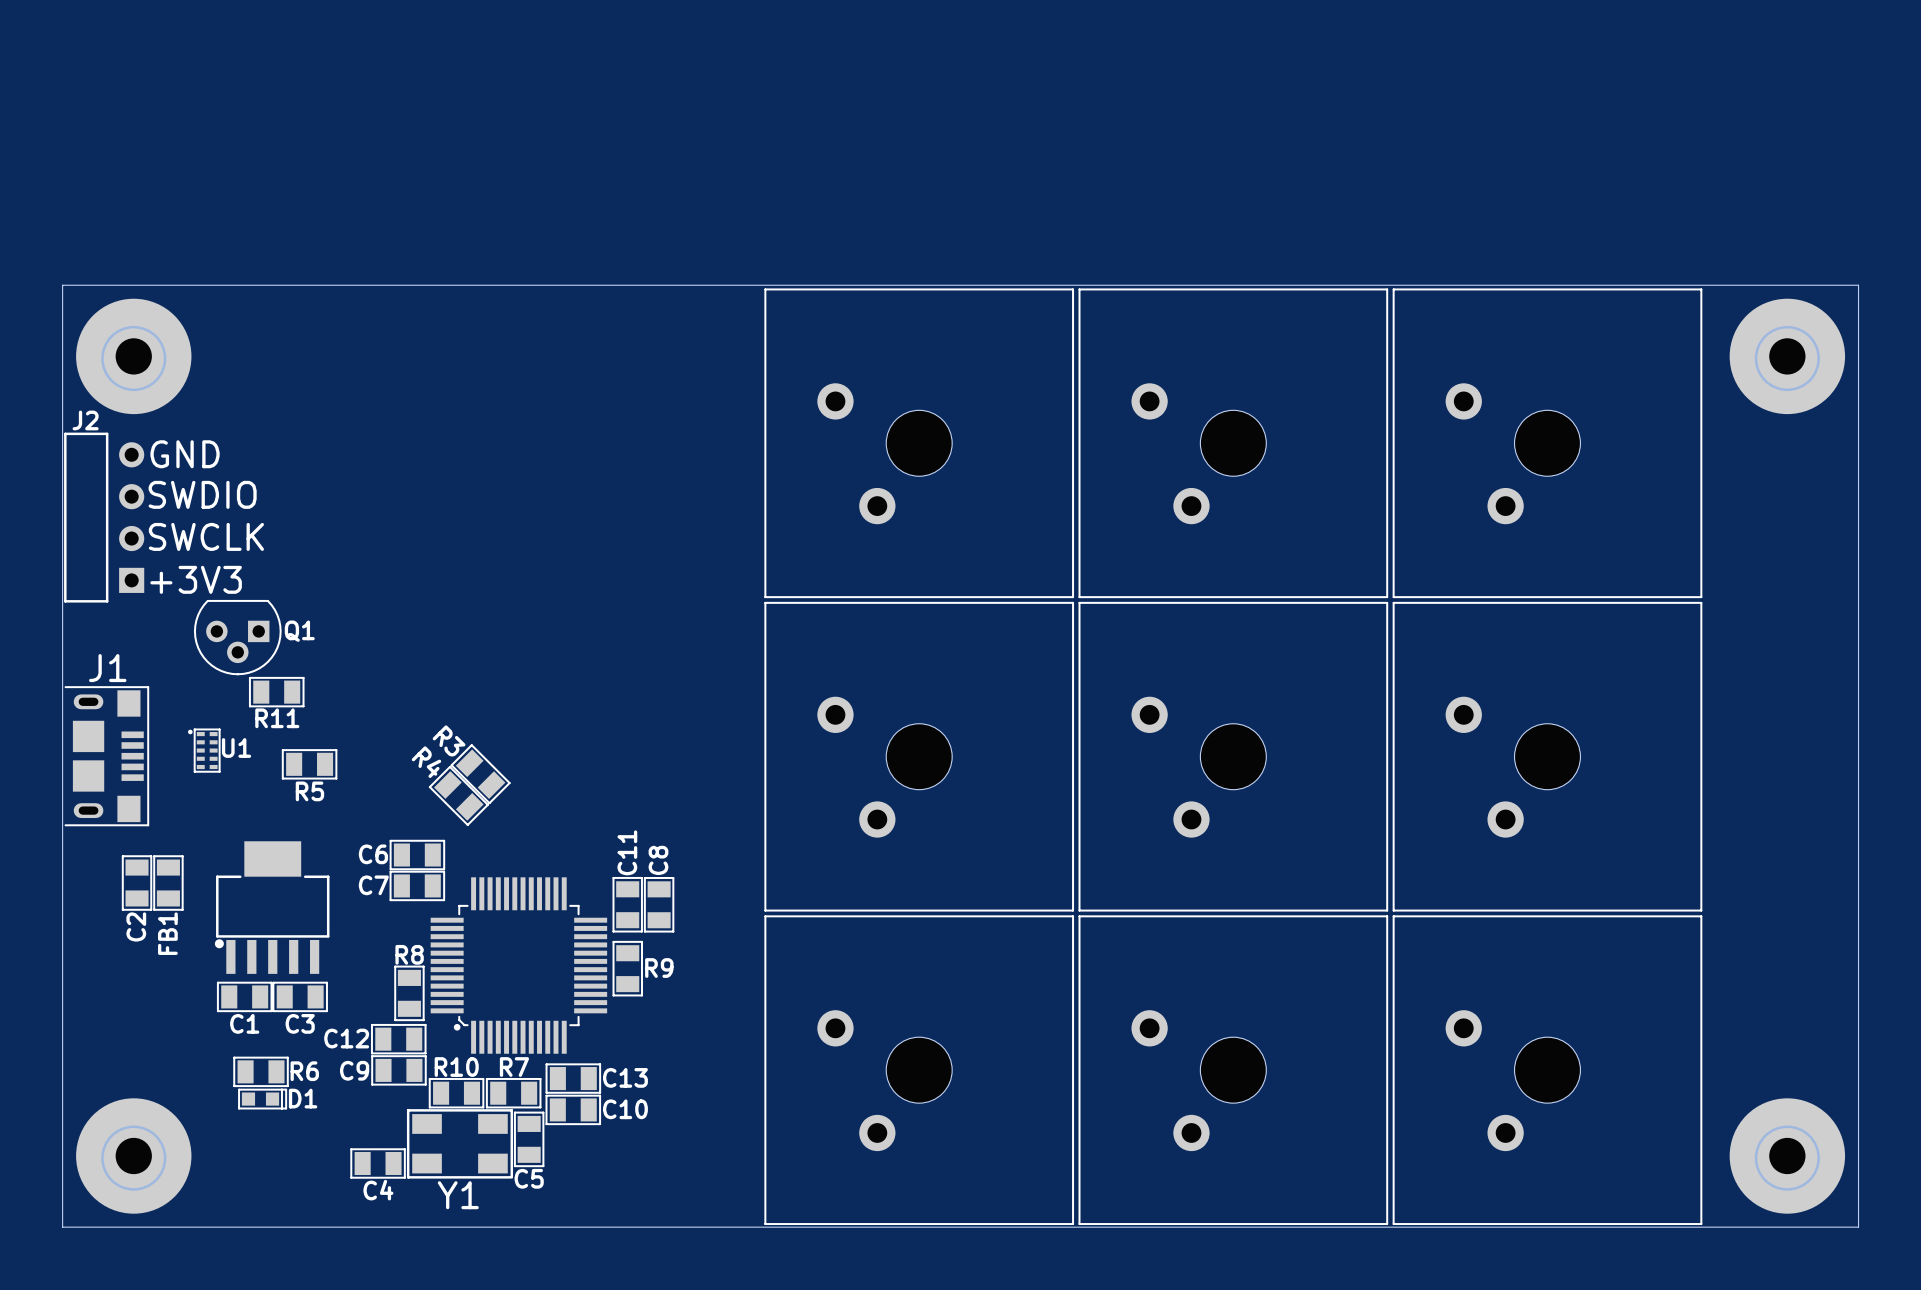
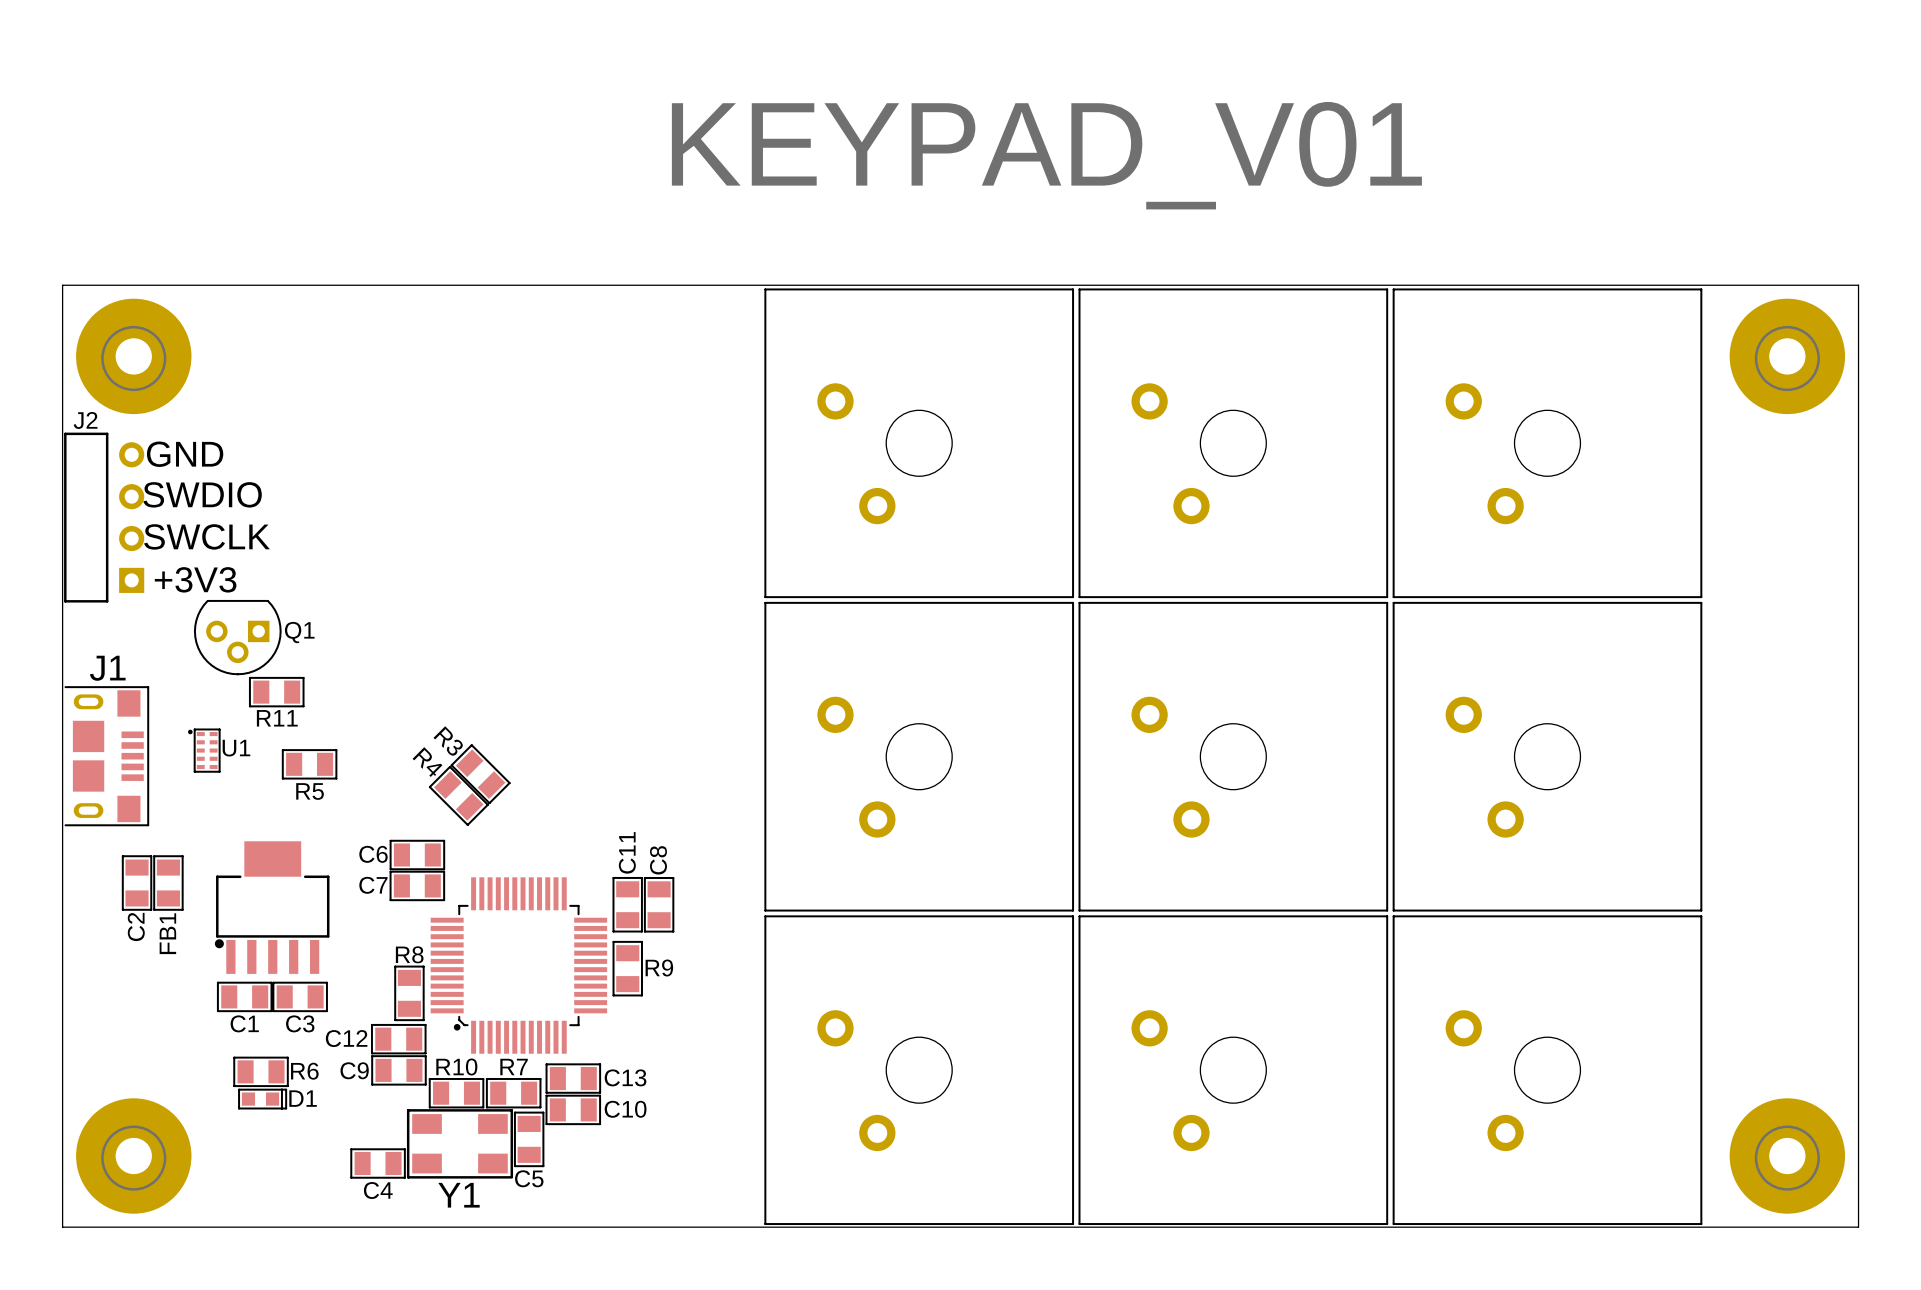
text: none -> KEYPAD_V01 (1046, 155)

